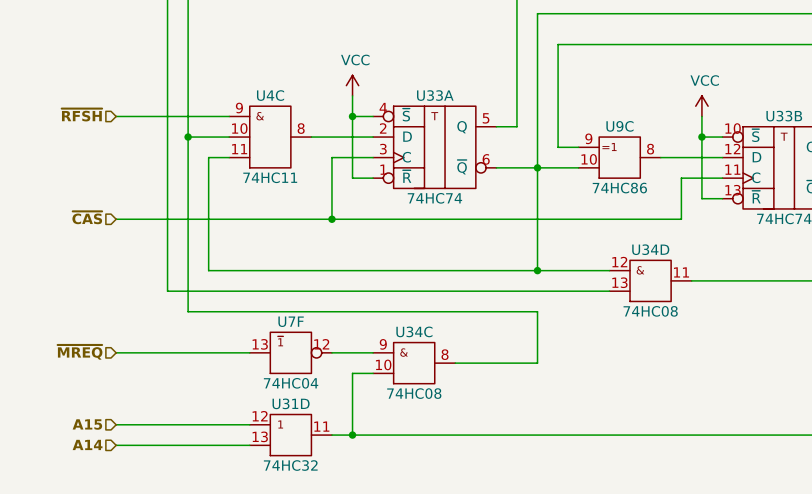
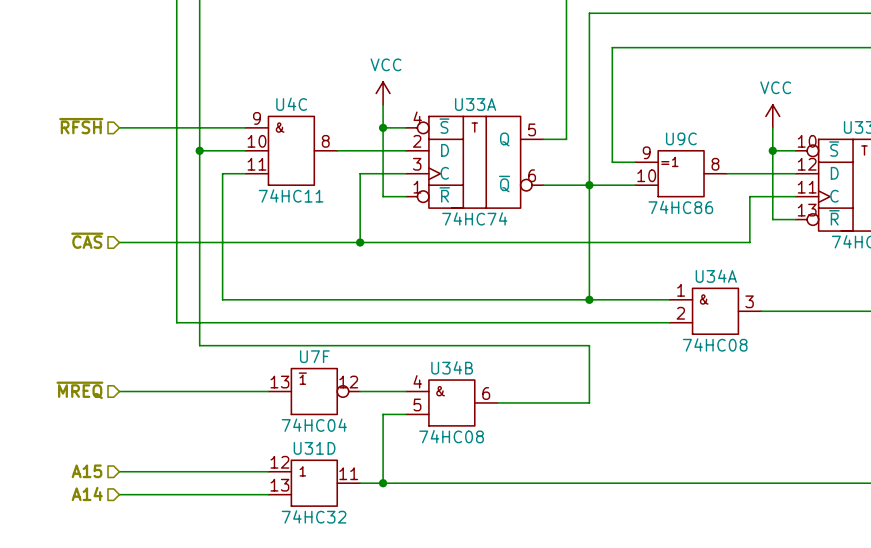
U34D name: U34D (650, 249) -> U34A (716, 276)
U34D pin number: 12 (619, 262) -> 1 (681, 290)
U34D pin number: 11 (681, 272) -> 3 (749, 301)
U34D pin number: 13 (619, 282) -> 2 (680, 313)
U34C name: U34C (414, 331) -> U34B (452, 367)
U34C pin number: 9 (383, 344) -> 4 (417, 381)
U34C pin number: 8 (445, 354) -> 6 (486, 393)
U34C pin number: 10 (383, 364) -> 5 (417, 404)

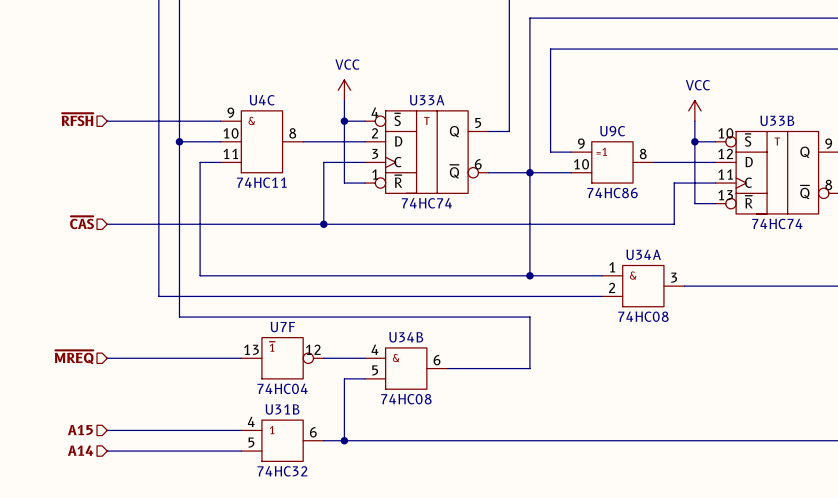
U31D name: U31D (314, 448) -> U31B (282, 409)
U31D pin number: 12 (279, 462) -> 4 (251, 421)
U31D pin number: 11 (348, 473) -> 6 (313, 432)
U31D pin number: 13 (279, 485) -> 5 (251, 442)

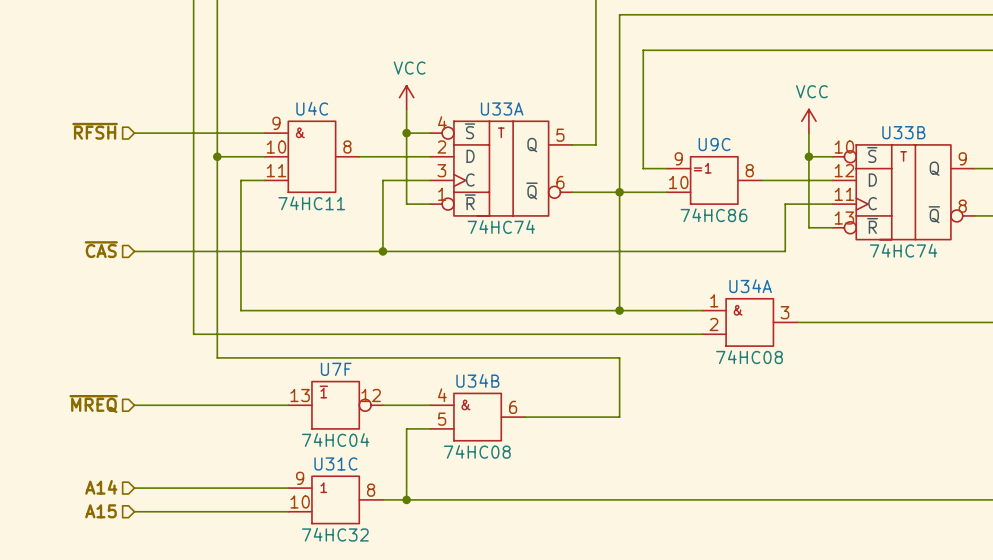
U31B name: U31B (282, 409) -> U31C (335, 463)
U31B pin number: 4 (251, 421) -> 9 (300, 478)
hierarchical label: A15 (80, 430) -> A14 (101, 487)
U31B pin number: 6 (313, 432) -> 8 (371, 490)
U31B pin number: 5 (251, 442) -> 10 (300, 501)
hierarchical label: A14 (80, 450) -> A15 (100, 511)

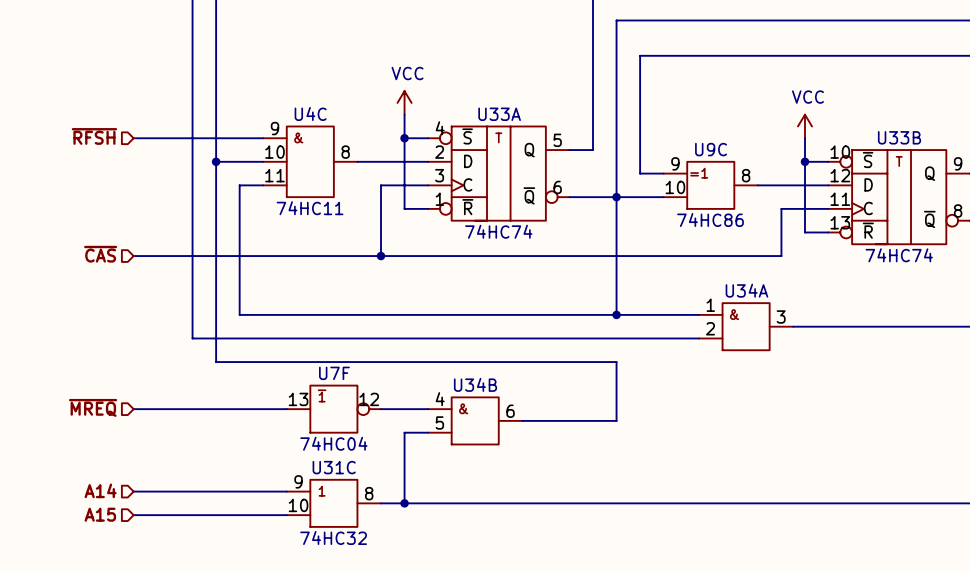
U34A value: 74HC08 (749, 357) -> none
U34B value: 74HC08 (477, 451) -> none

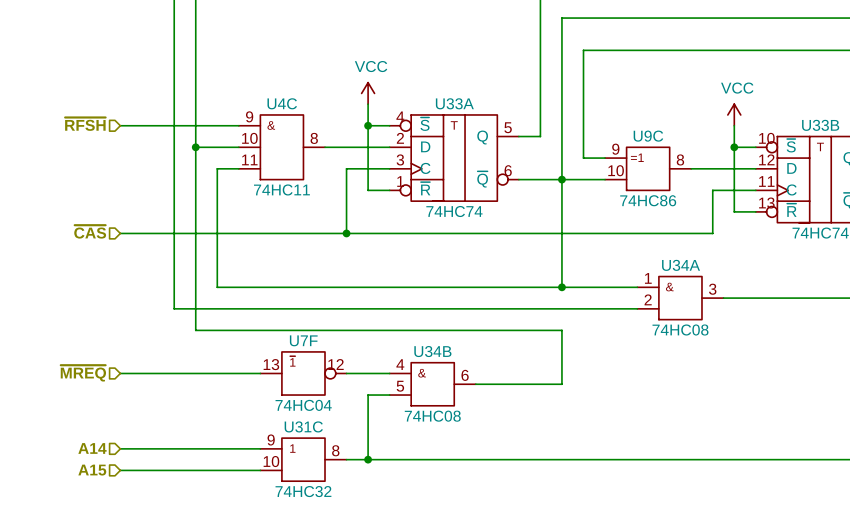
U34A value: none -> 74HC08 (680, 329)
U34B value: none -> 74HC08 (432, 416)

